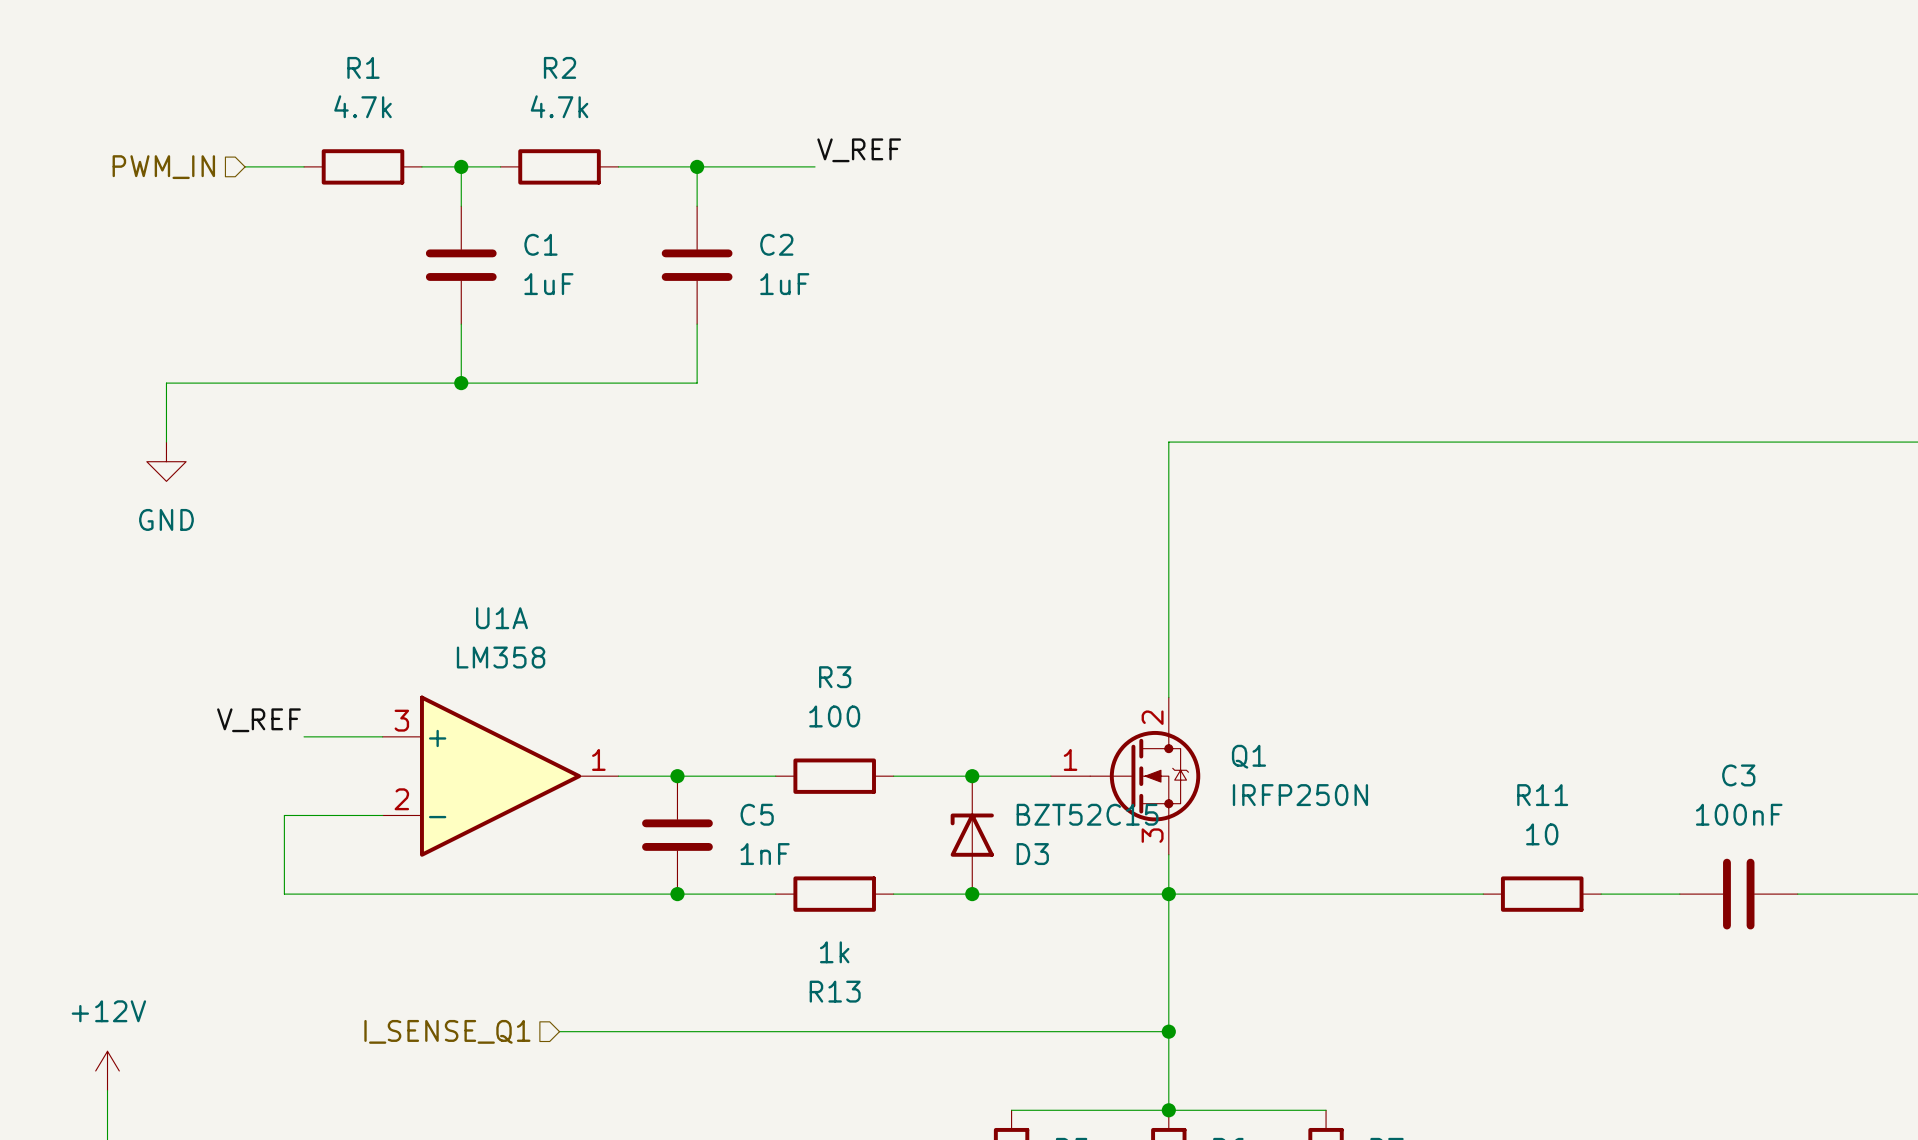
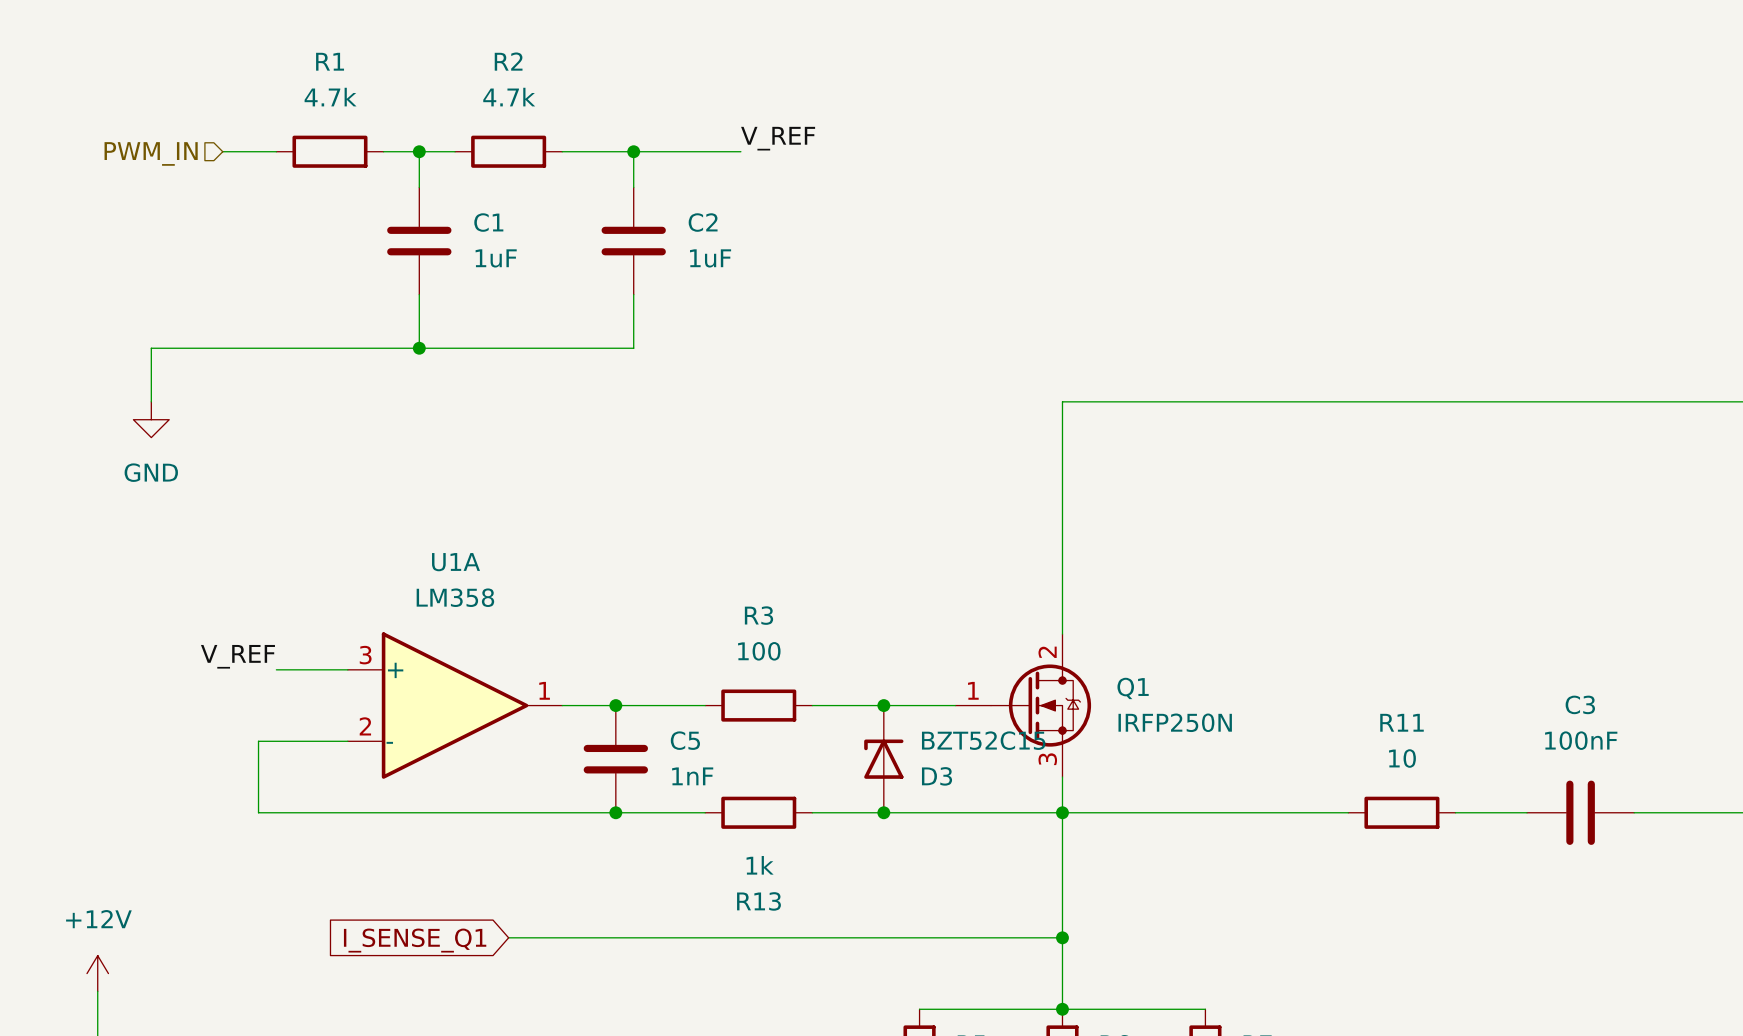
hierarchical label: I_SENSE_Q1 (447, 1031) -> none
global label: none -> I_SENSE_Q1 (415, 940)

